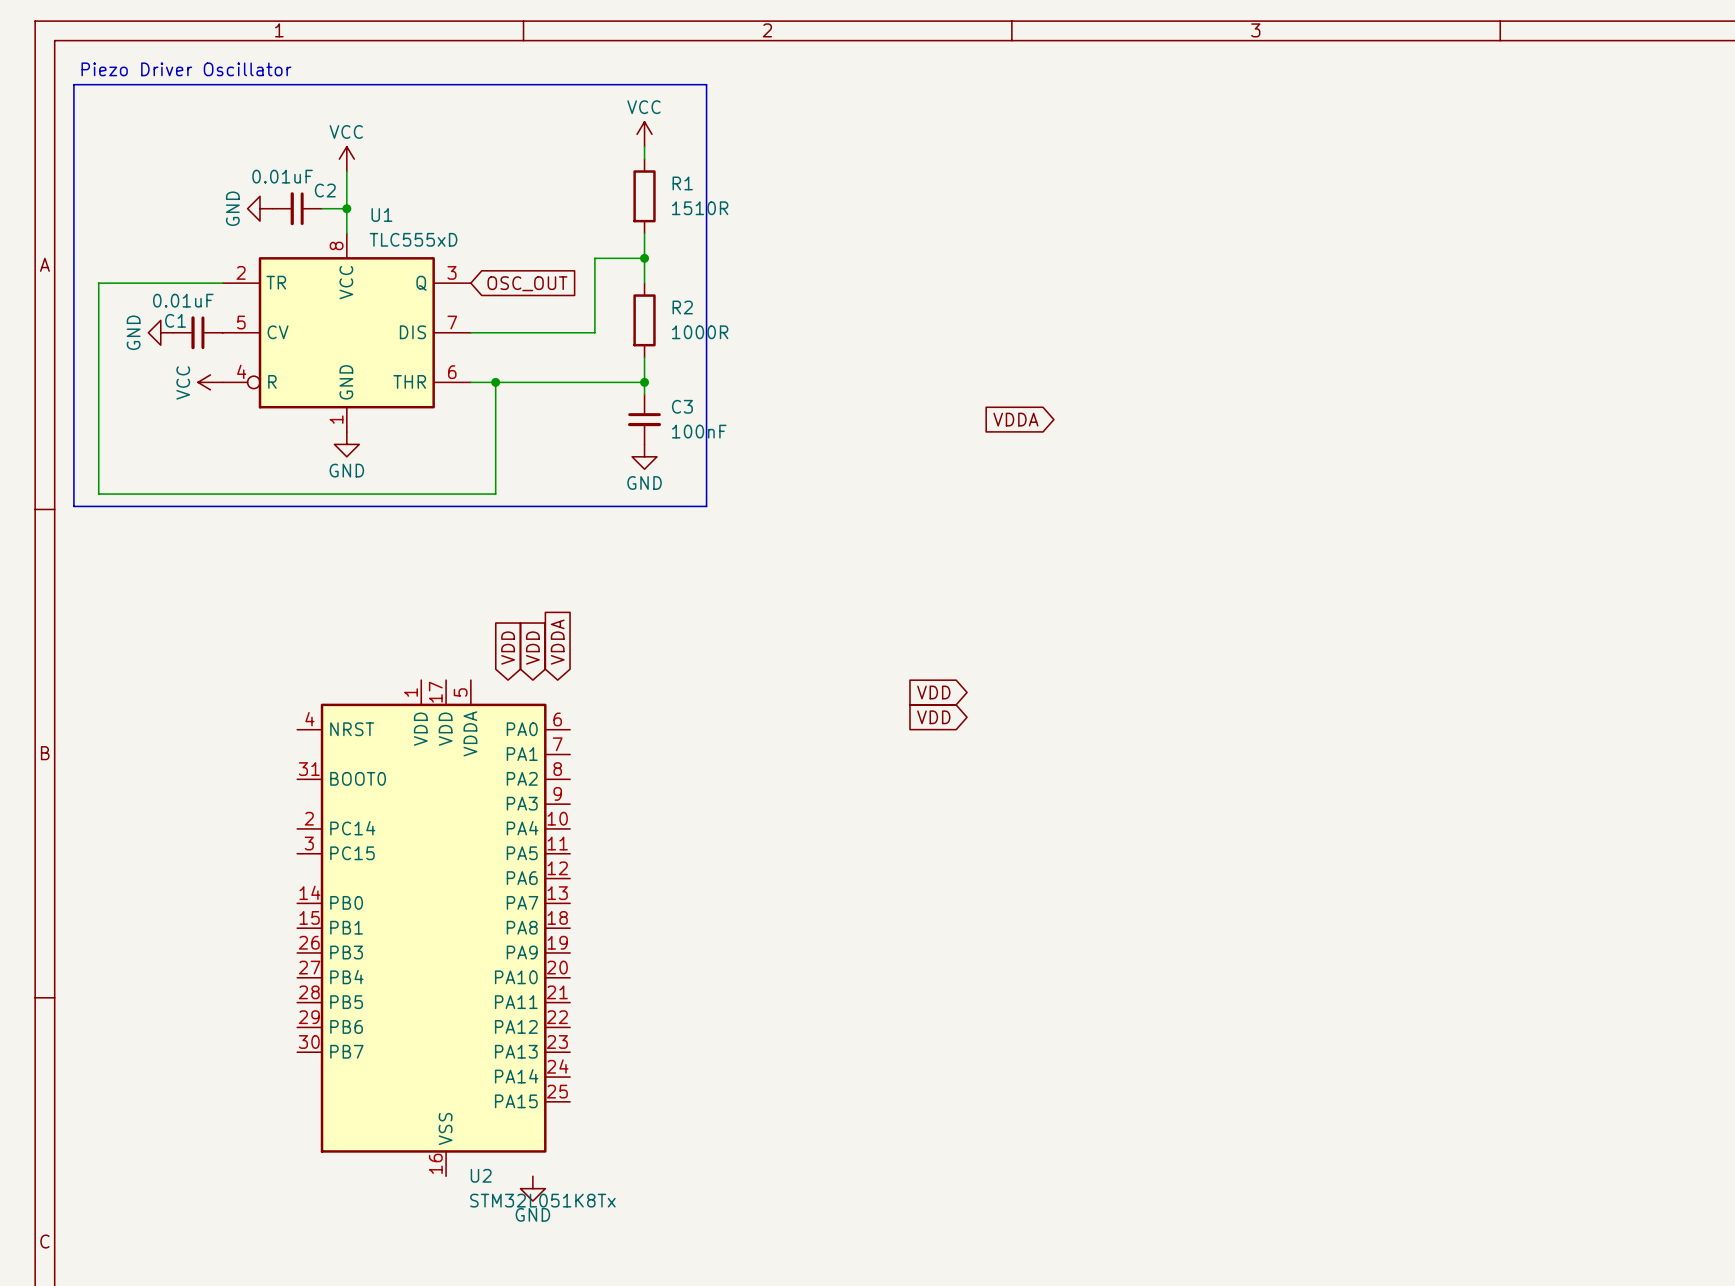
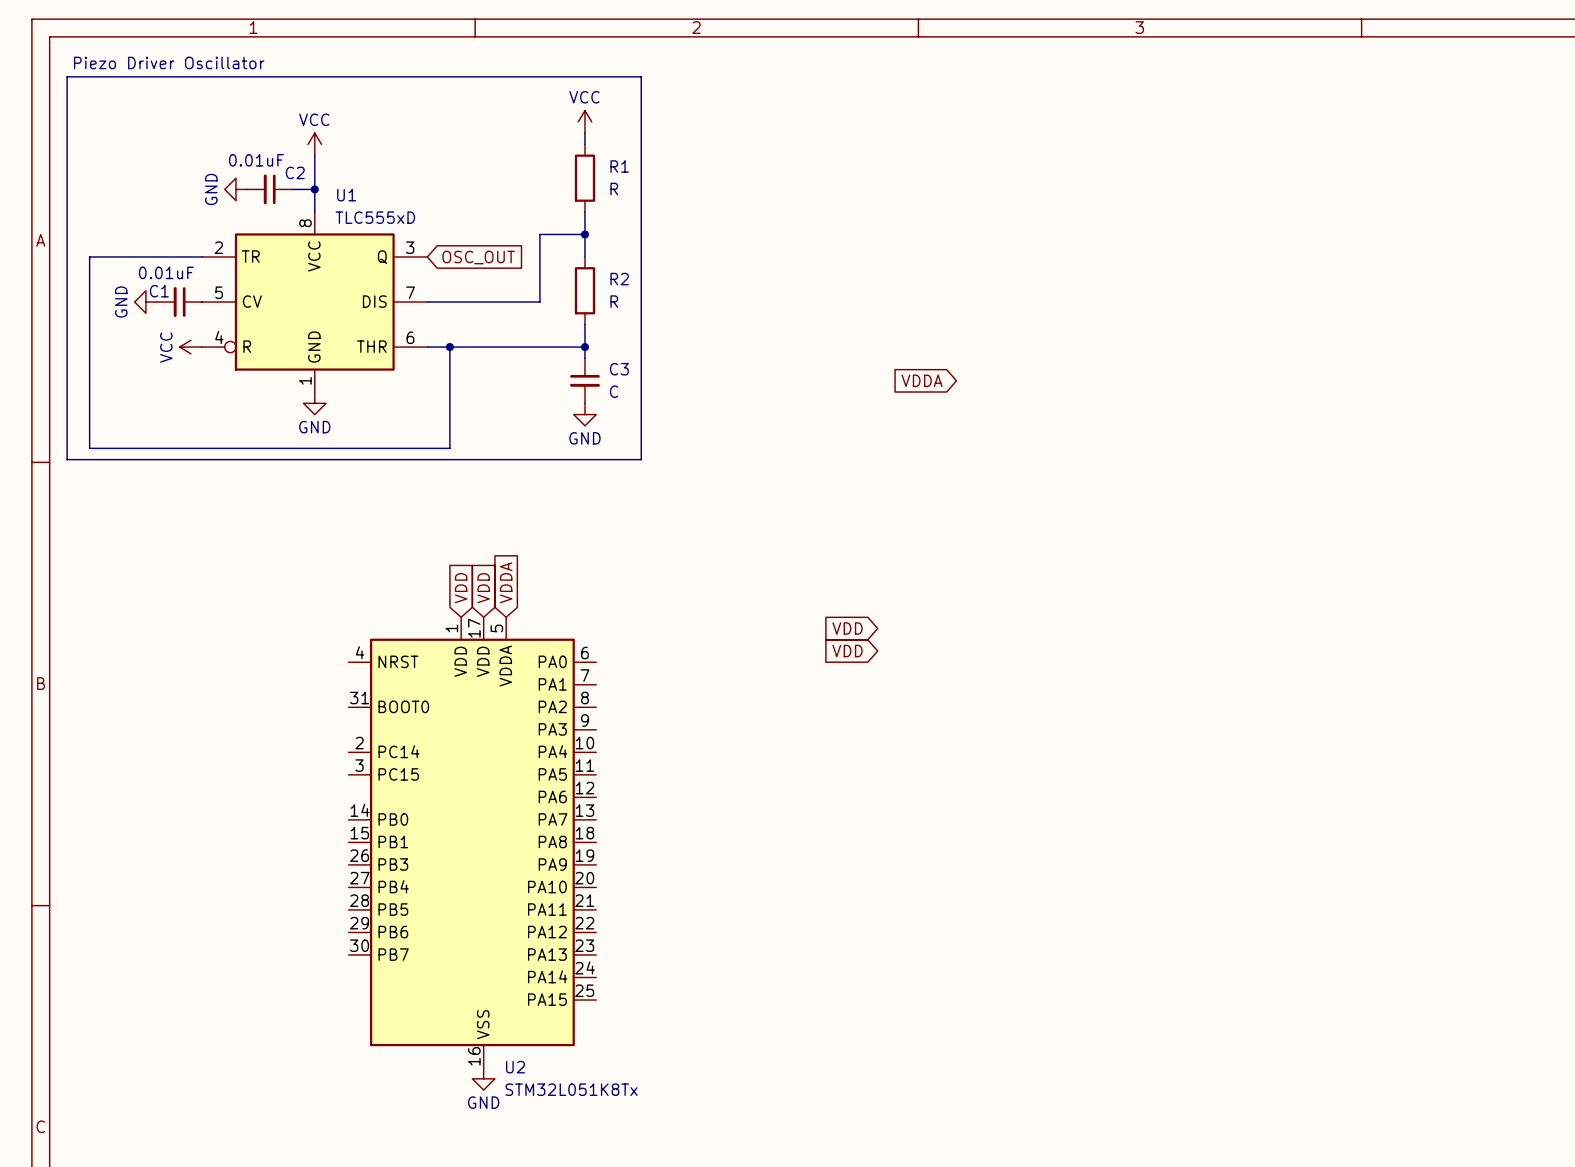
R1 value: 1510R (700, 208) -> R (614, 189)
R2 value: 1000R (700, 332) -> R (614, 301)
C3 value: 100nF (699, 431) -> C (614, 391)
U2 position: (433, 928) -> (472, 842)

